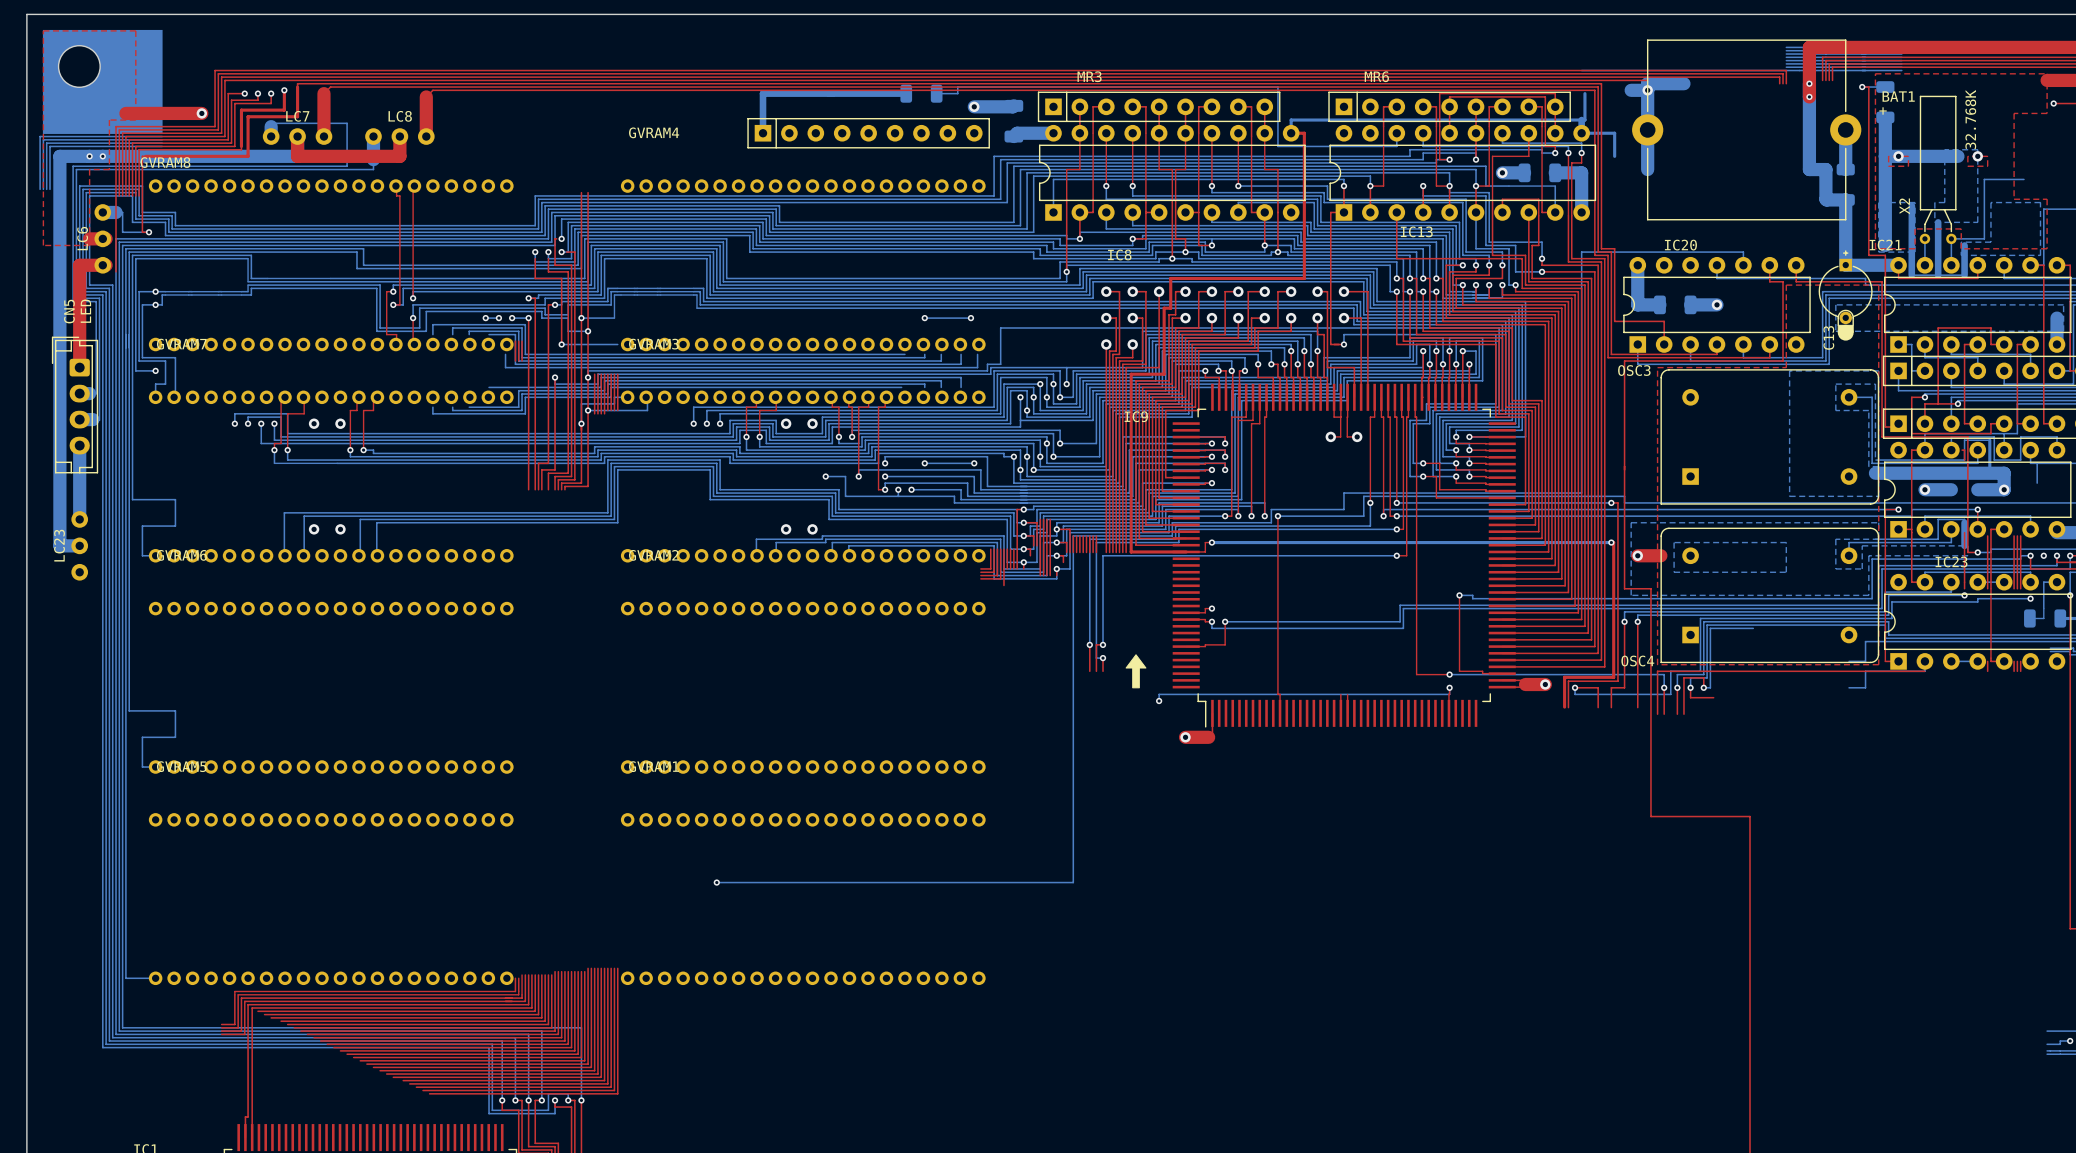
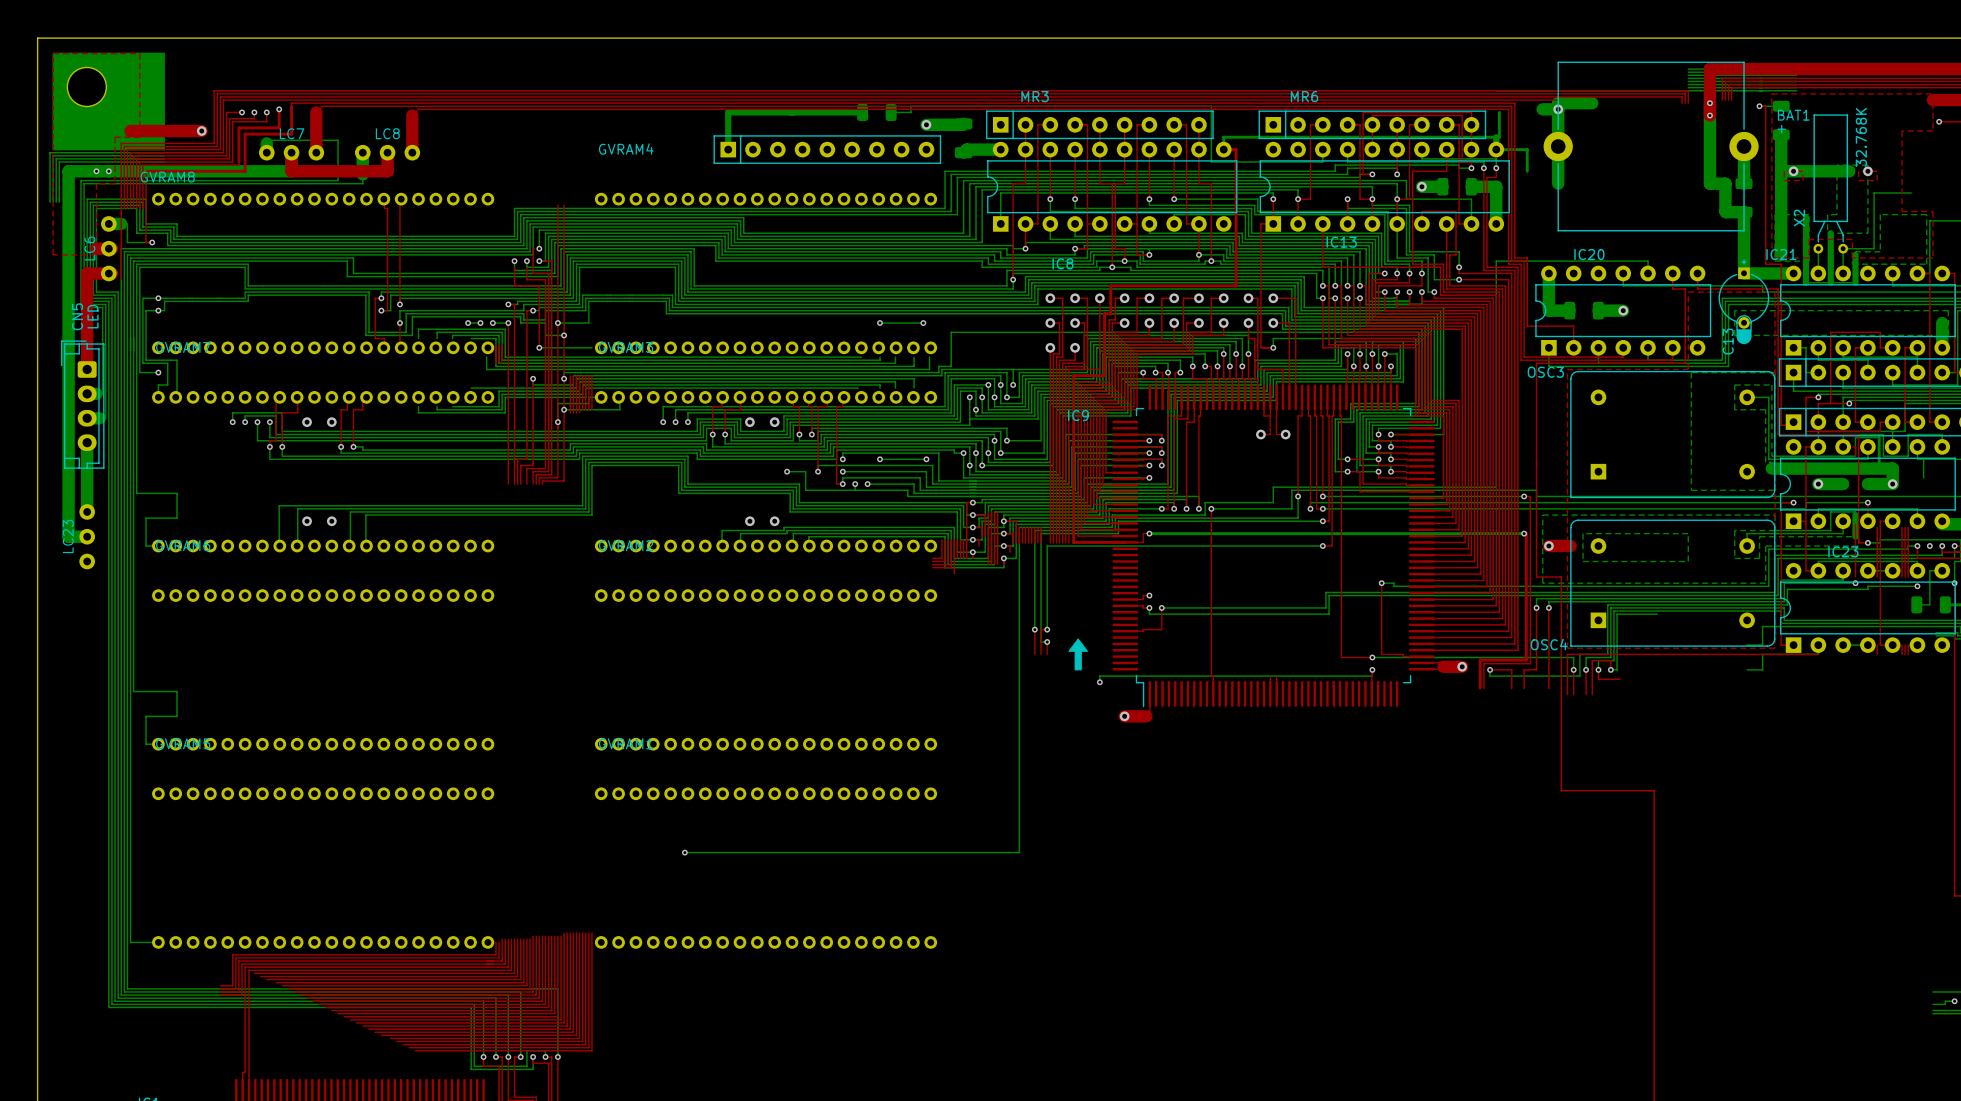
top track: (1898, 265) (1898, 278) (1977, 278) (1977, 265) -> none

